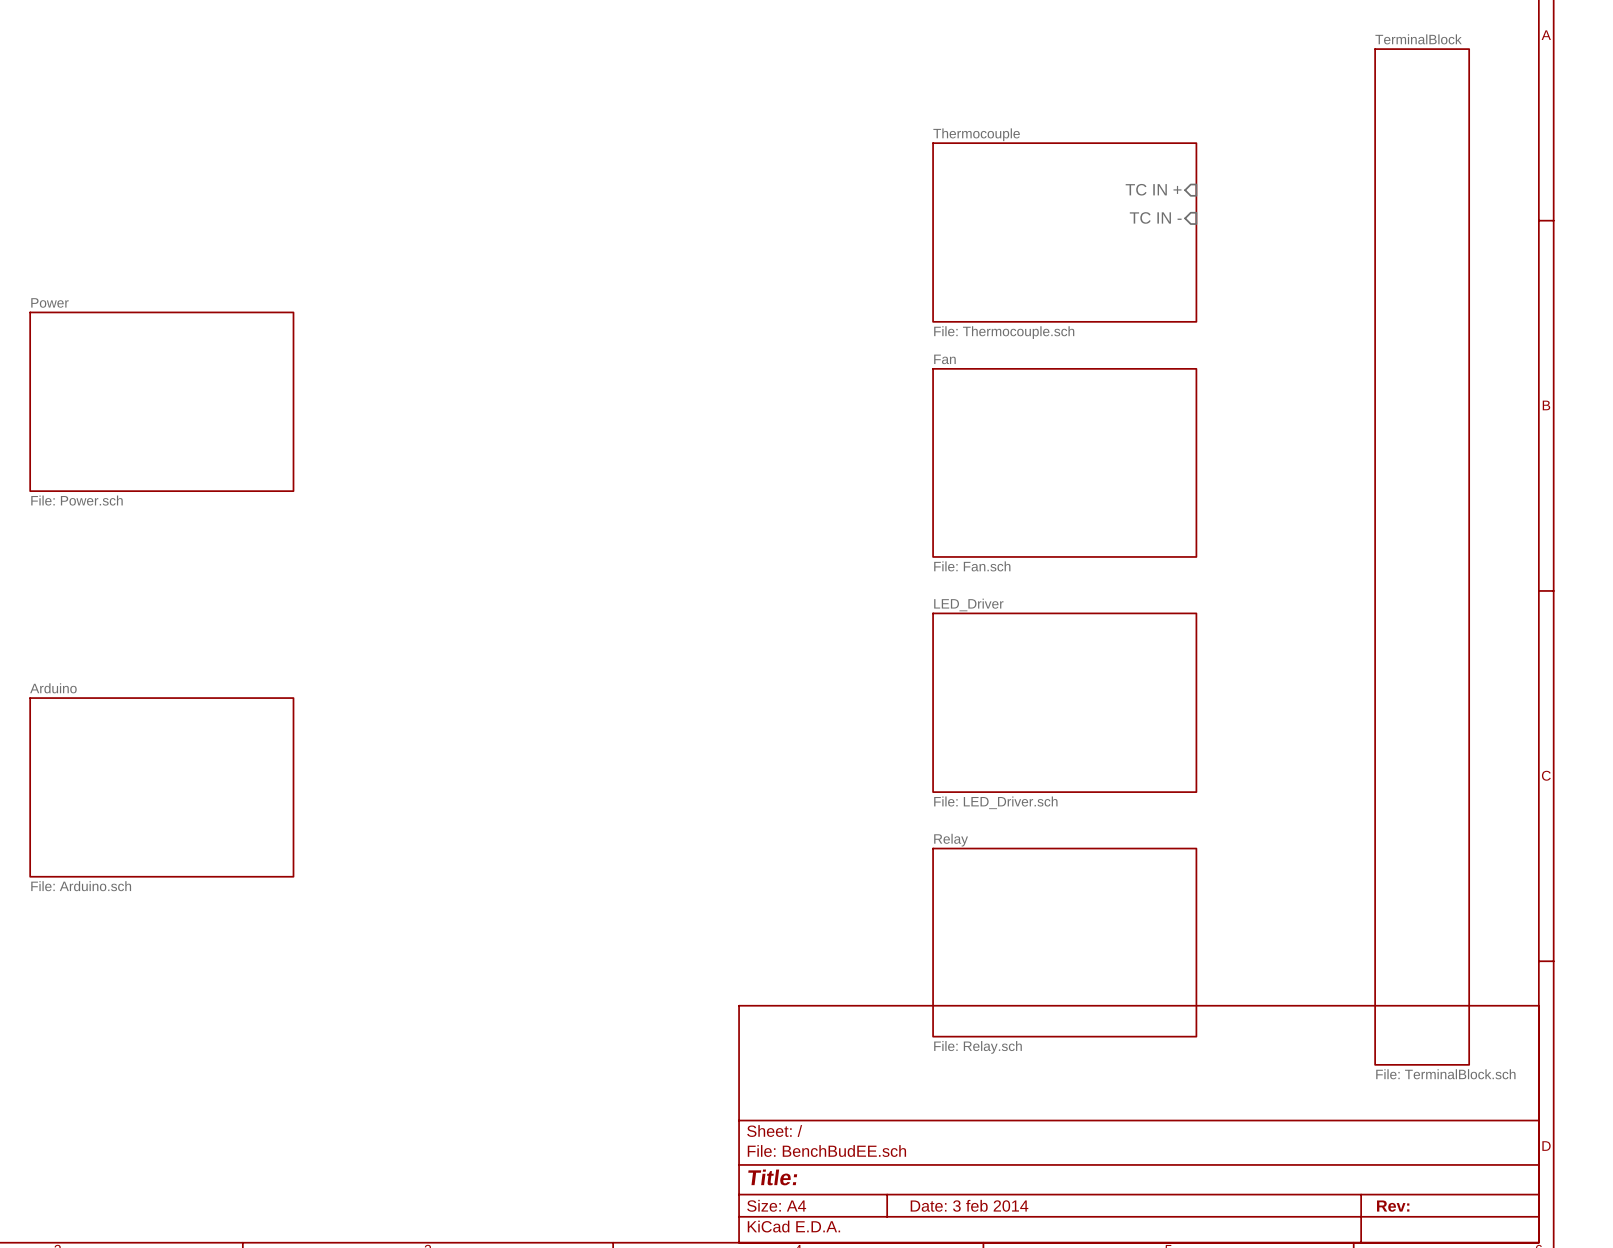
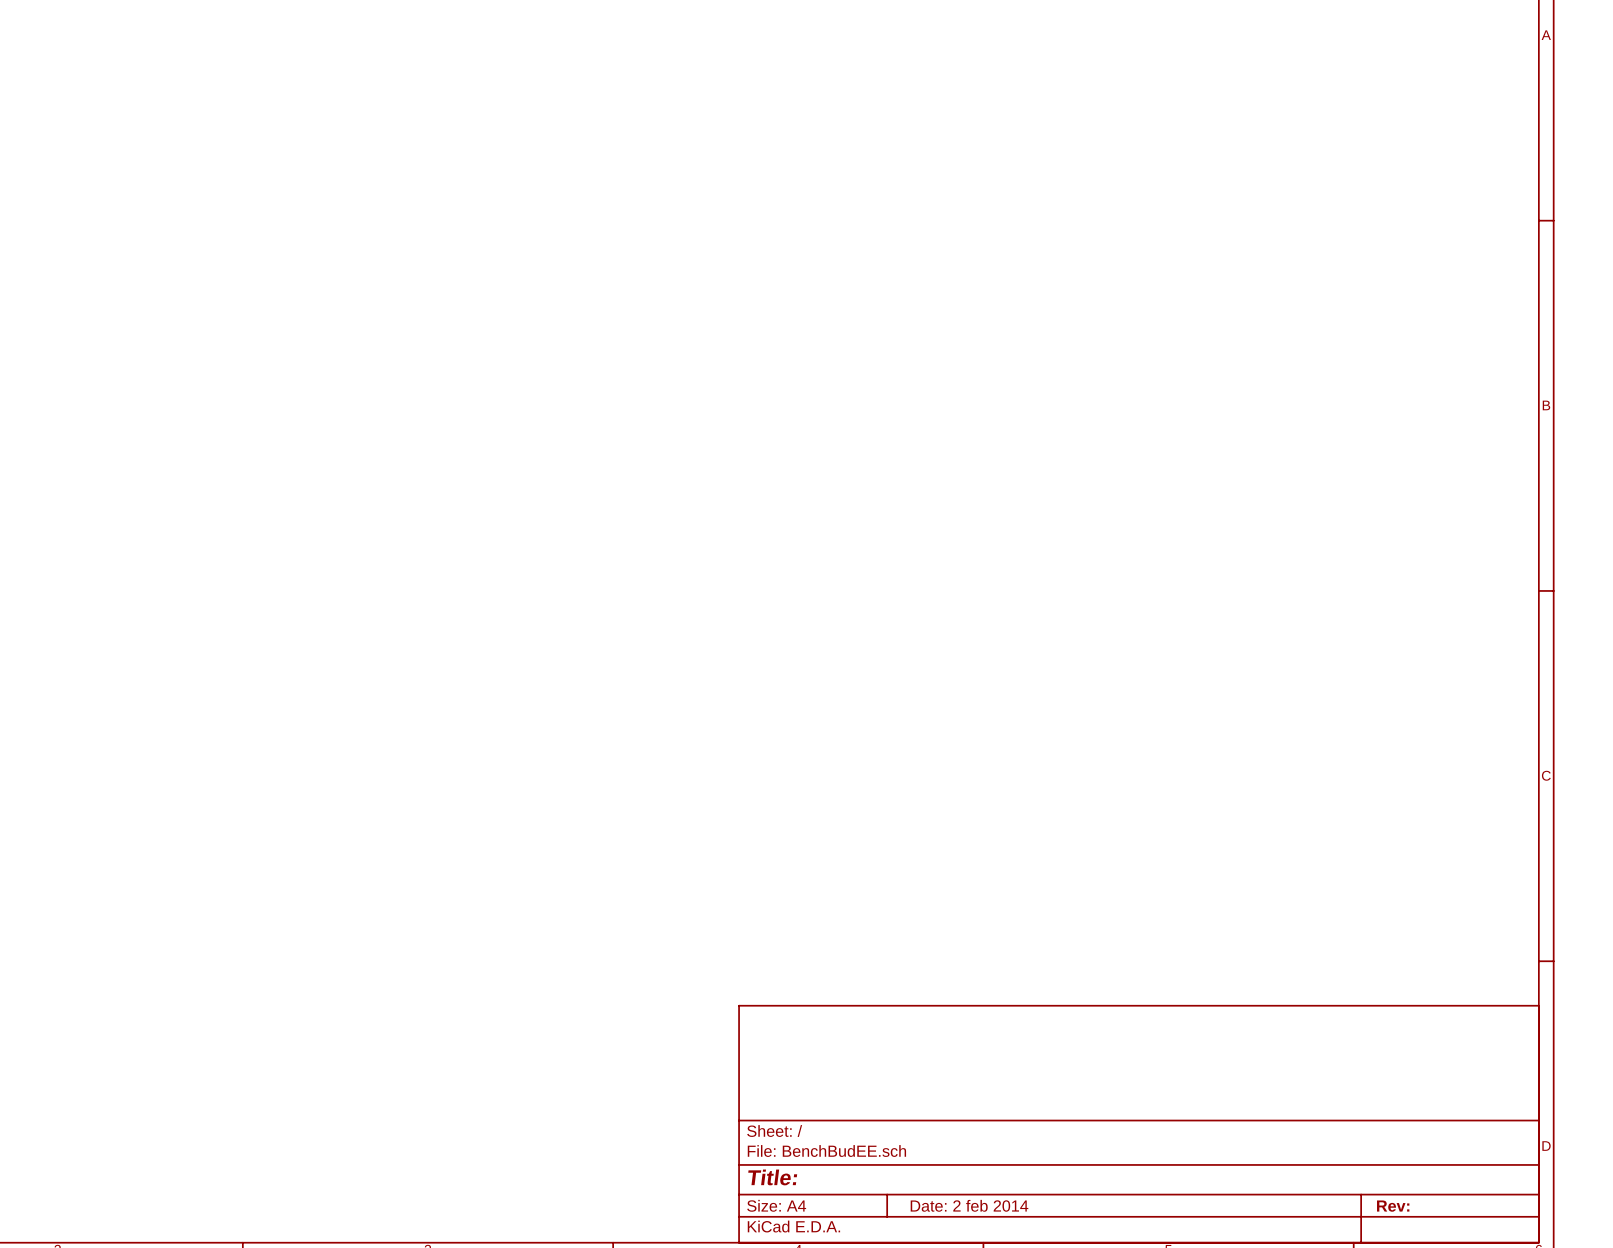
sheet pin: TC IN + (1153, 189) -> none
sheet pin: TC IN - (1155, 217) -> none
sheet Thermocouple: File: Thermocouple.sch (1064, 232) -> none
sheet Power: File: Power.sch (161, 401) -> none
sheet Fan: File: Fan.sch (1064, 462) -> none
sheet TerminalBlock: File: TerminalBlock.sch (1422, 556) -> none
sheet LED_Driver: File: LED_Driver.sch (1064, 702) -> none
sheet Arduino: File: Arduino.sch (161, 787) -> none
sheet Relay: File: Relay.sch (1064, 942) -> none
title block: Date: 3 feb 2014 (969, 1205) -> Date: 2 feb 2014 (969, 1205)

